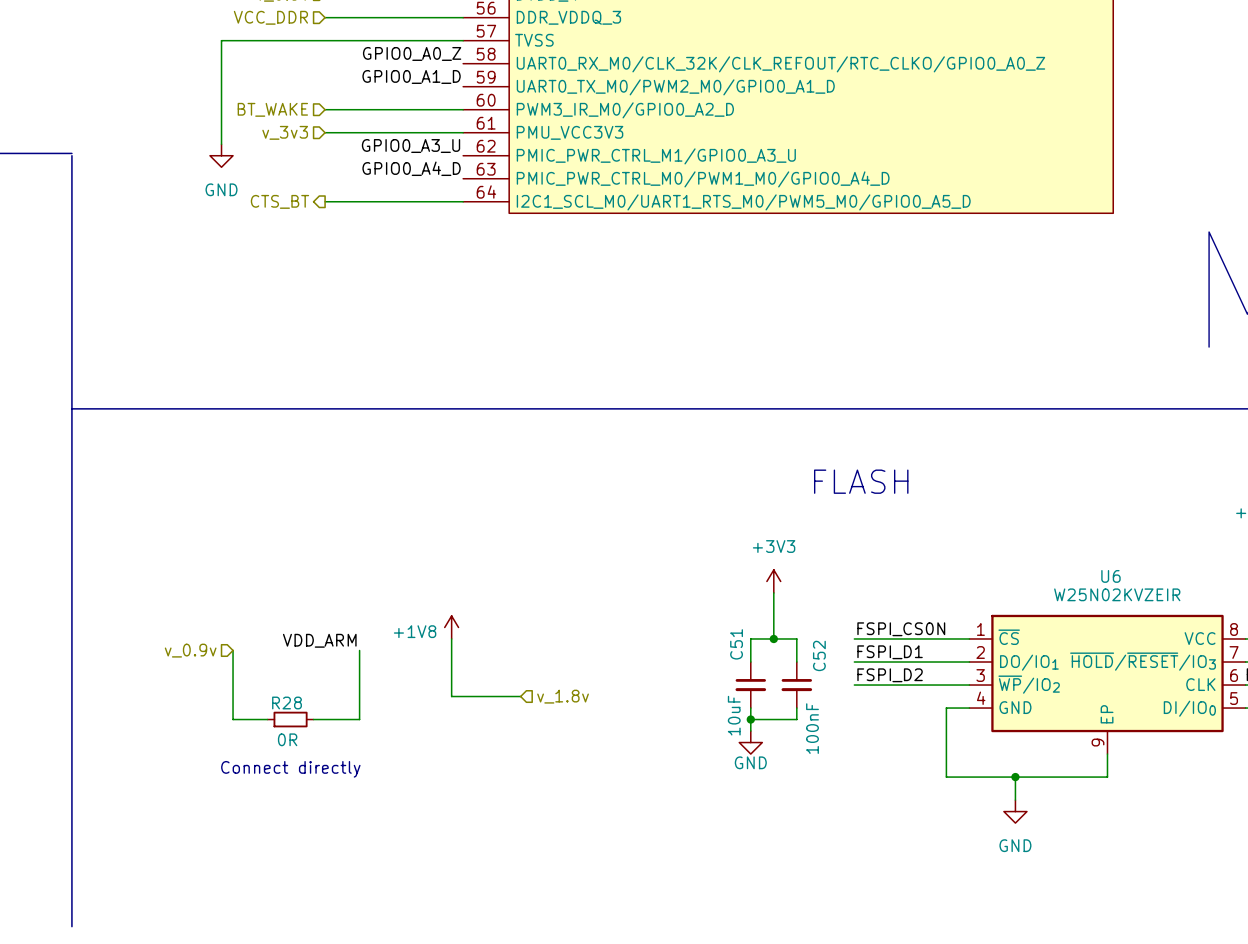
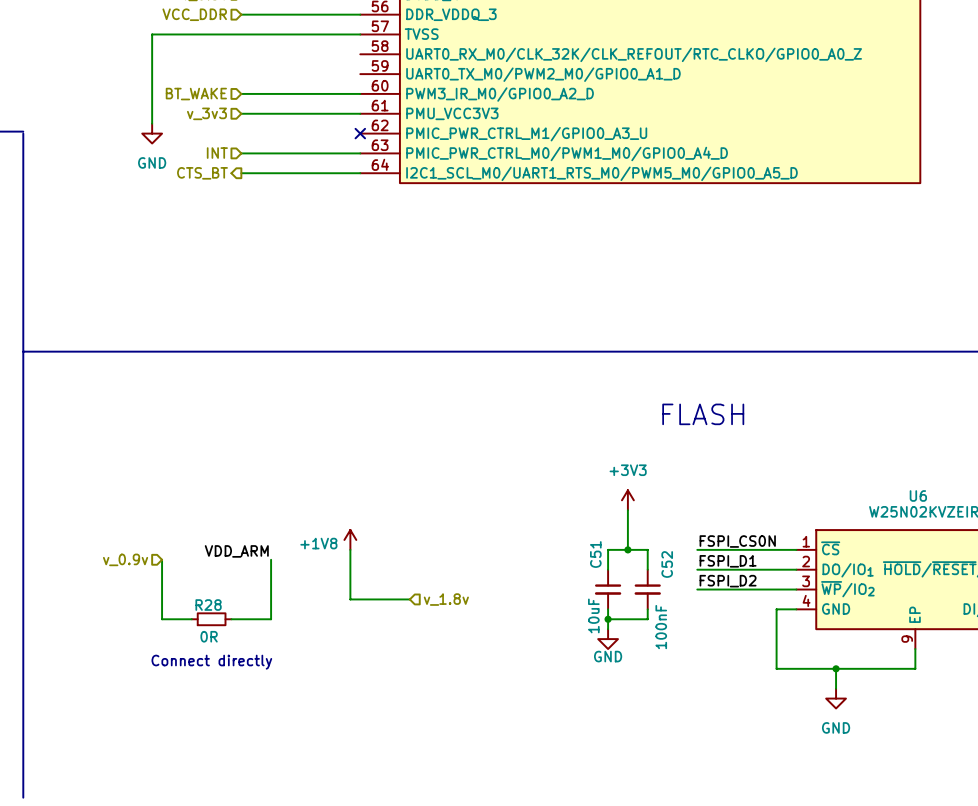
label: GPIO0_A0_Z (412, 53) -> none
label: GPIO0_A1_D (411, 76) -> none
label: GPIO0_A3_U (411, 146) -> none
no-connect mark: none -> (360, 133)
label: GPIO0_A4_D (411, 168) -> none
hierarchical label: none -> INT (217, 153)
wire: none -> (241, 153) (360, 153)

